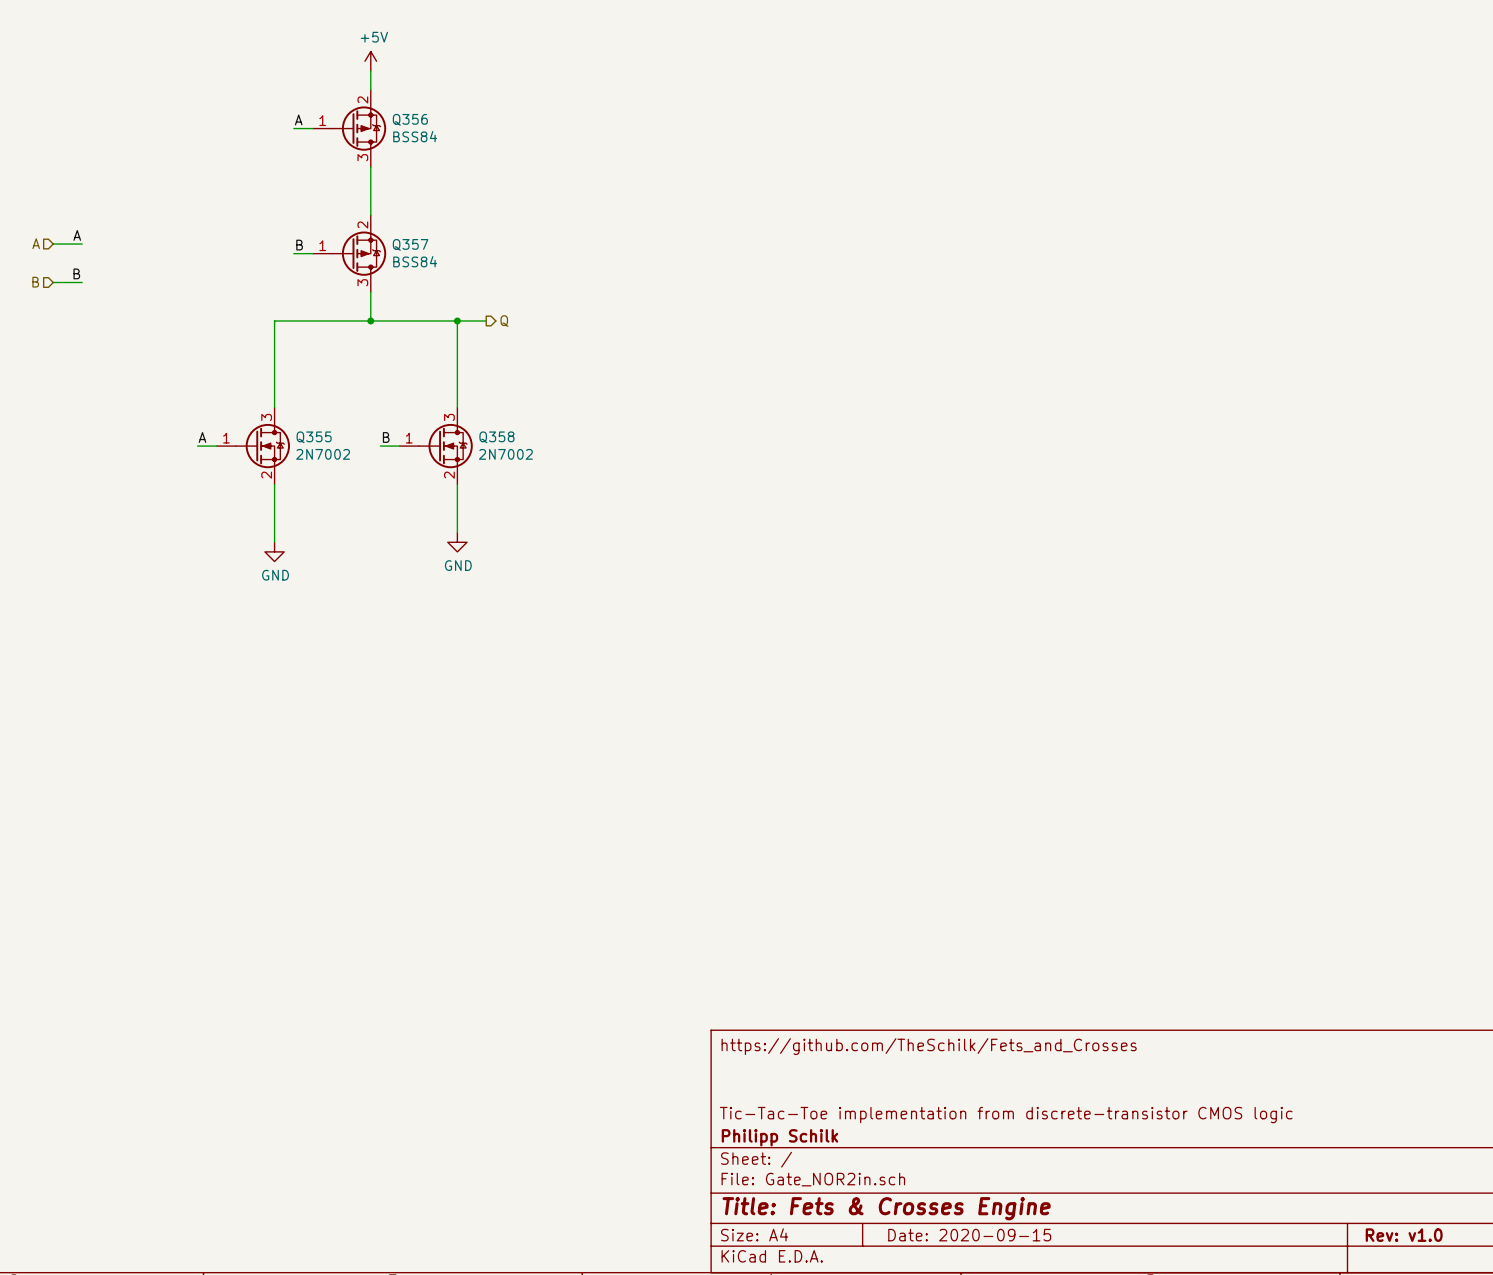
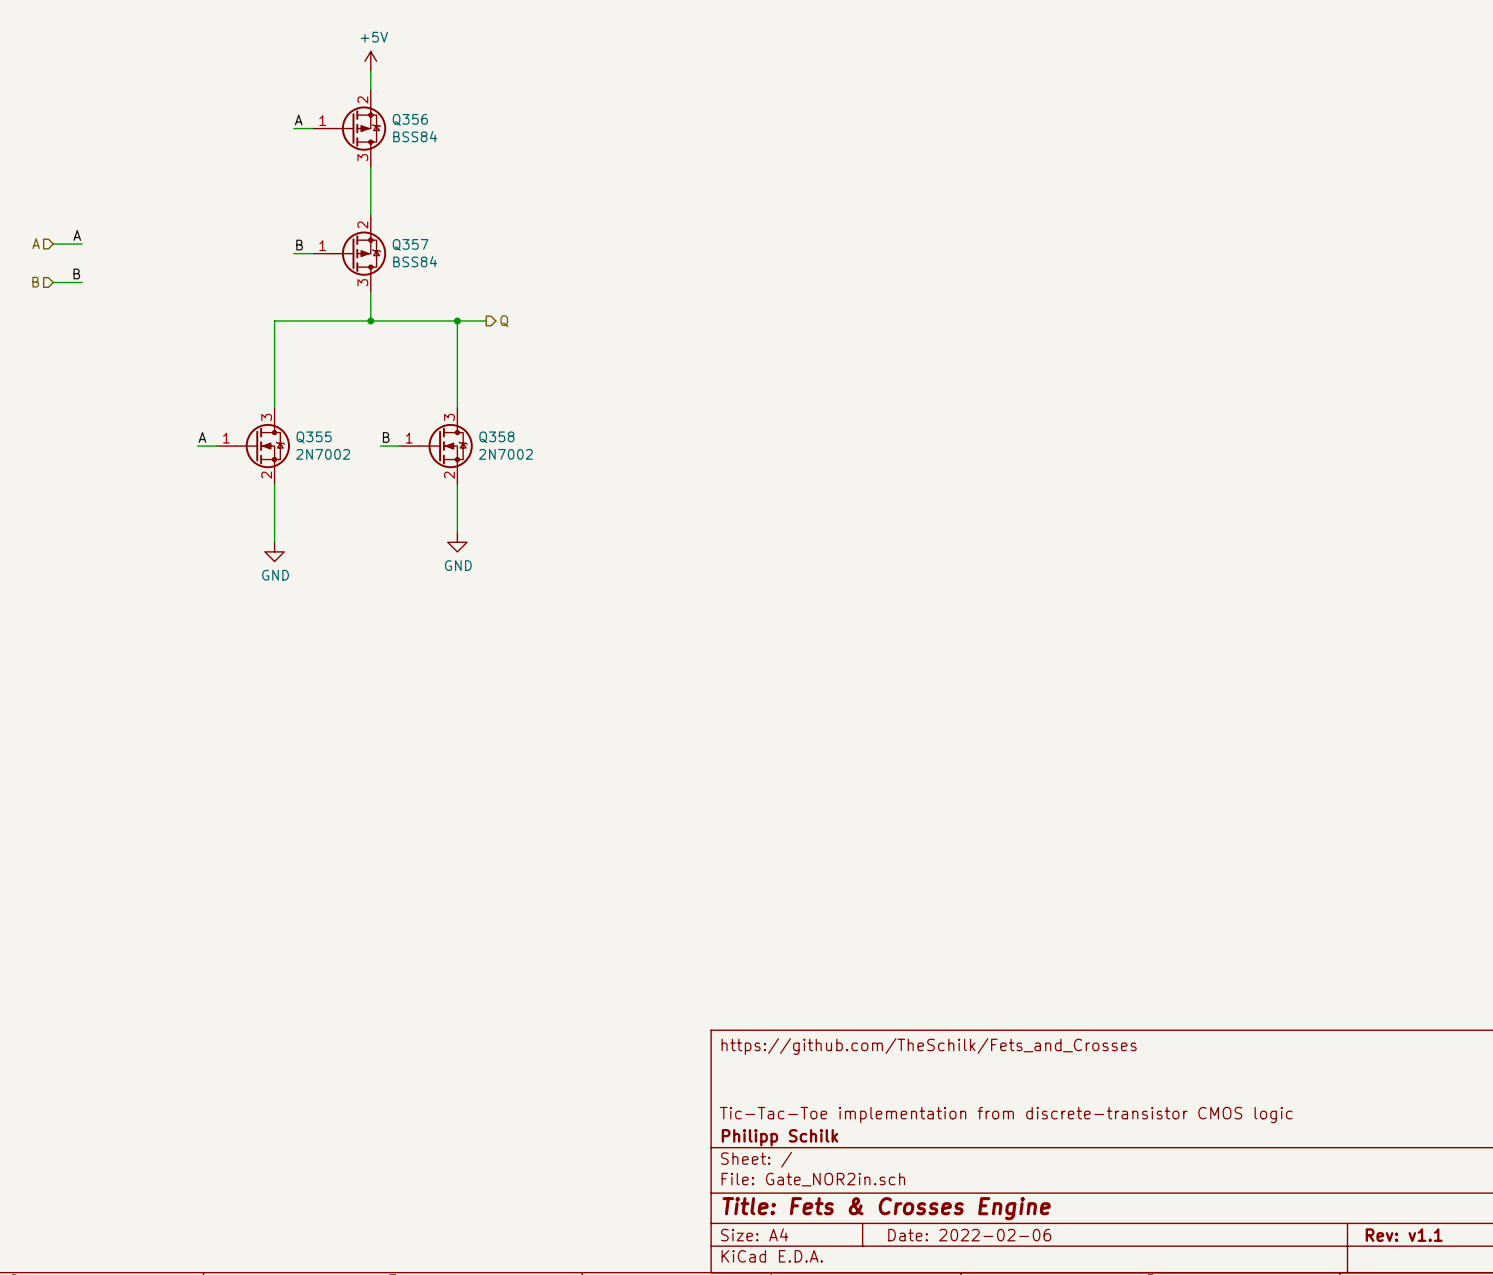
title block: Date: 2020-09-15 (969, 1235) -> Date: 2022-02-06 (969, 1235)
title block: Rev: v1.0 (1404, 1235) -> Rev: v1.1 (1404, 1235)

